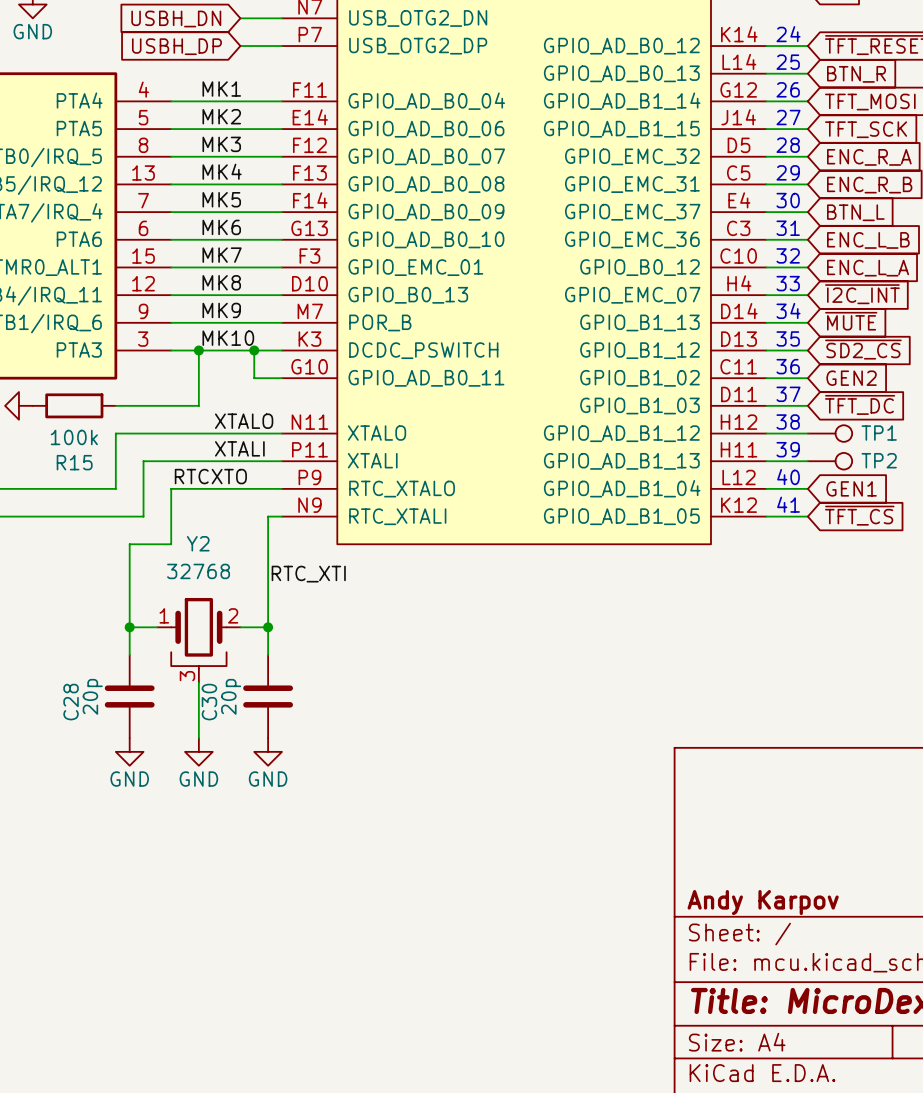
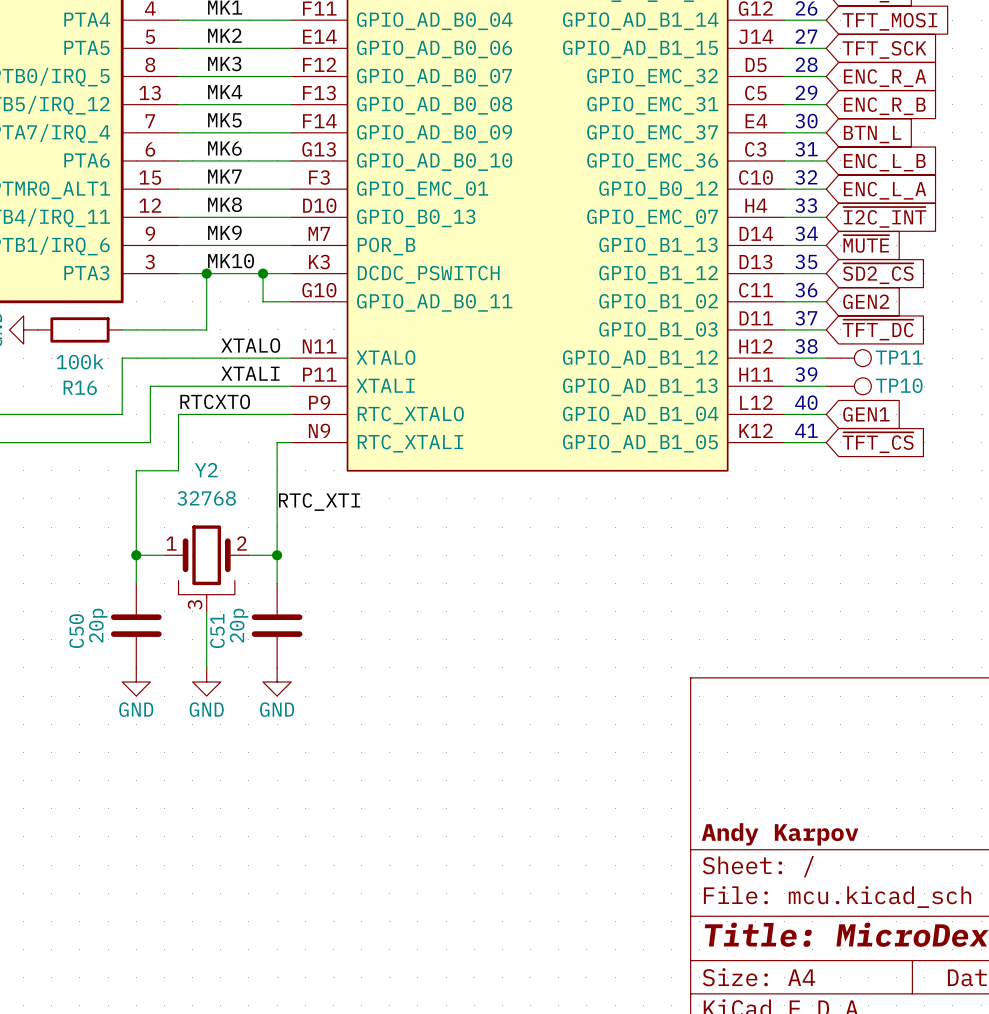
TP1 name: TP1 (879, 433) -> TP11 (899, 357)
TP2 name: TP2 (879, 460) -> TP10 (899, 385)
R15 name: R15 (74, 462) -> R16 (80, 387)
C28 name: C28 (71, 702) -> C50 (76, 631)
C30 name: C30 (209, 702) -> C51 (217, 631)

